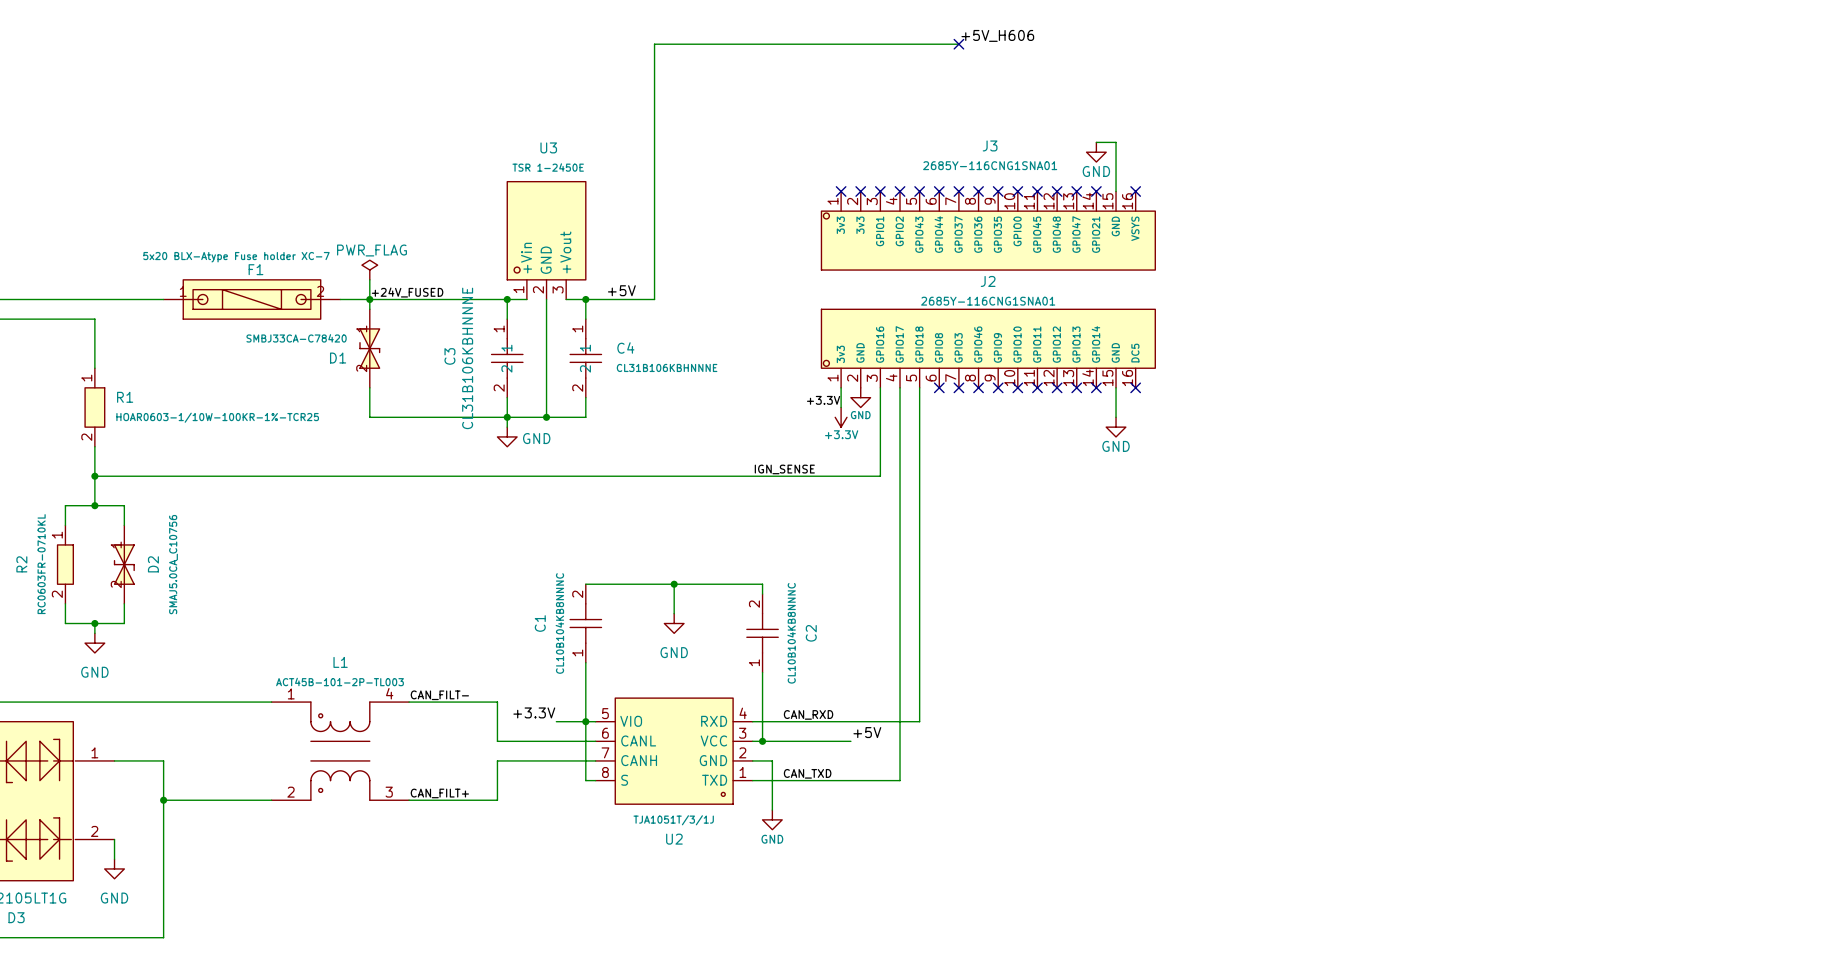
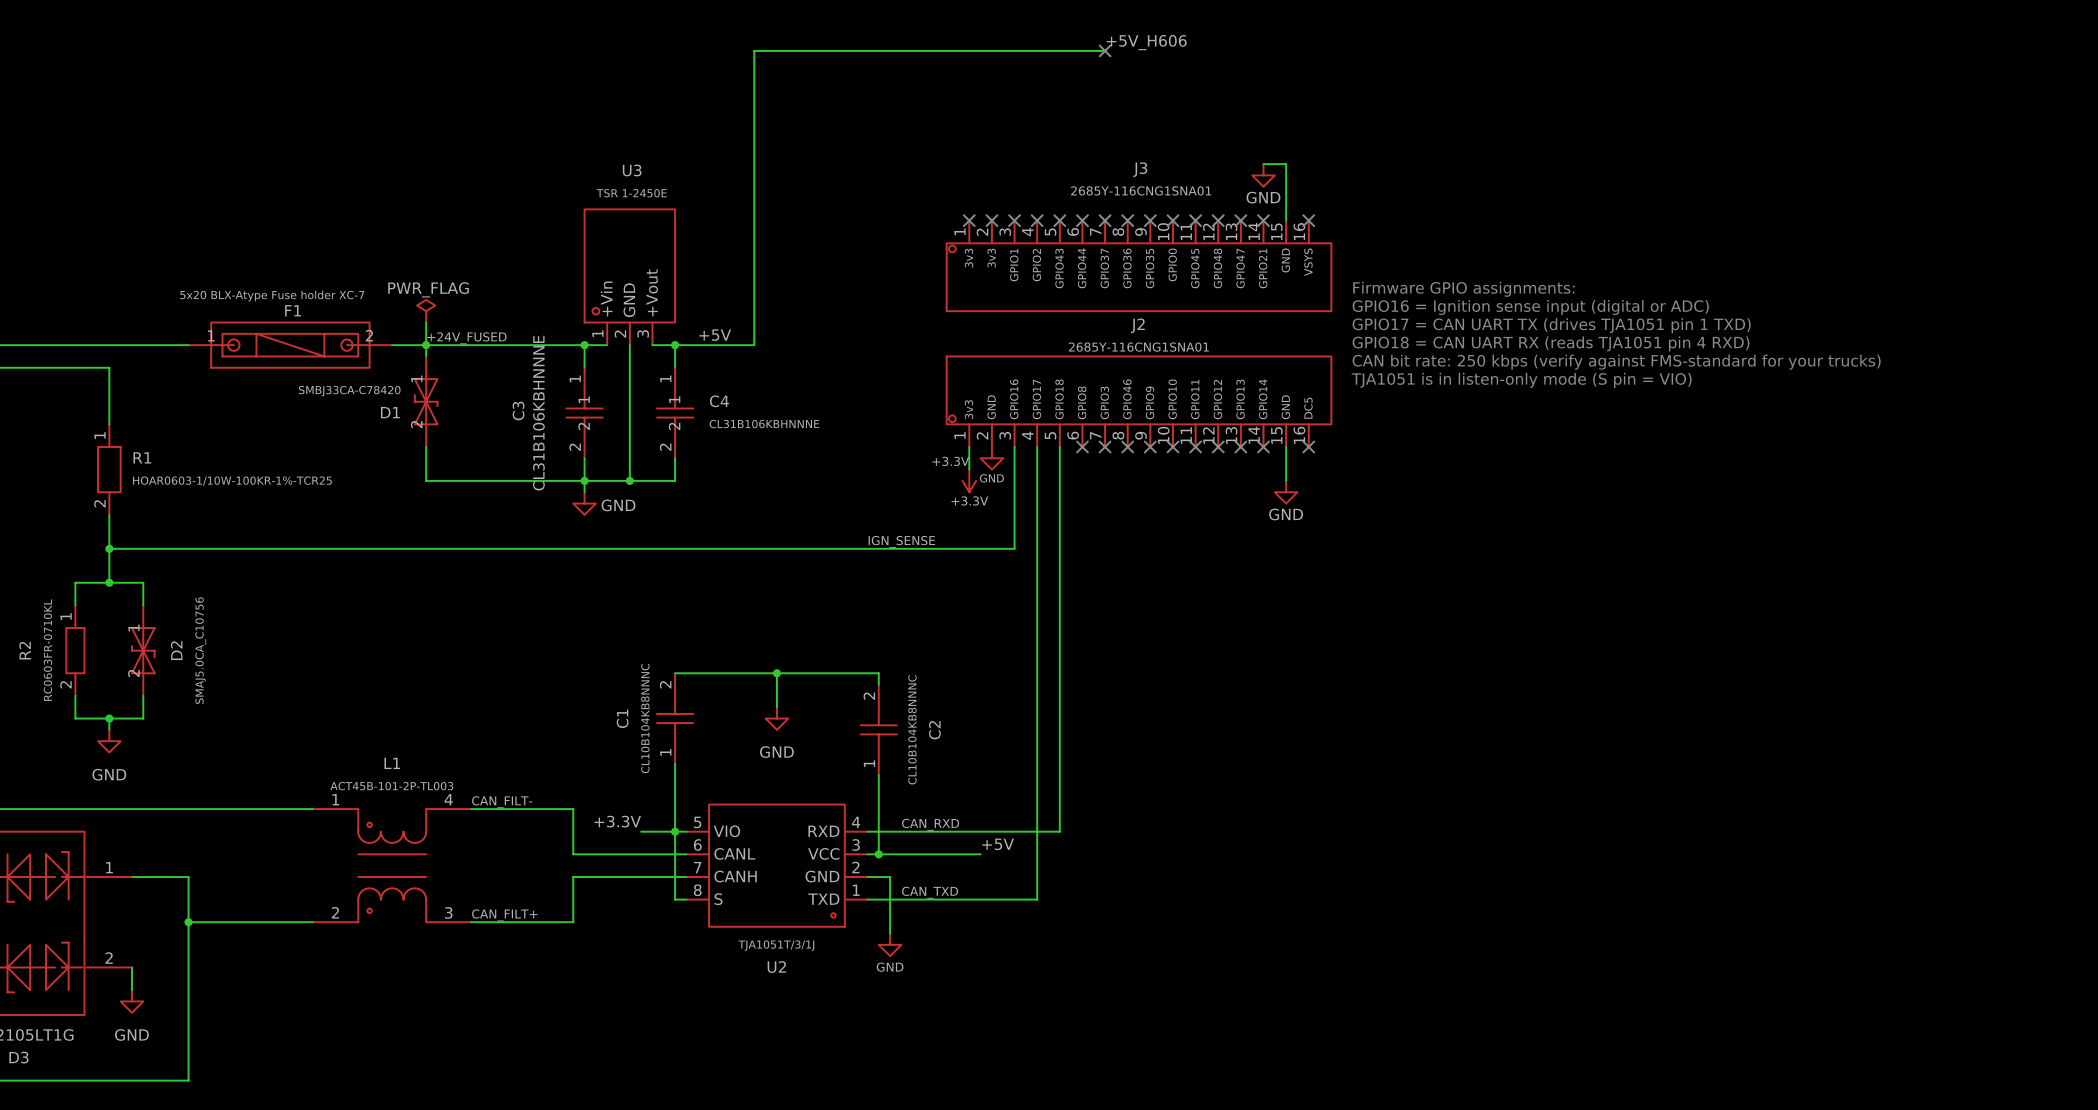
text: none -> Firmware GPIO assignments: (1463, 289)
text: none -> GPIO16 = Ignition sense input (digital or ADC) (1530, 307)
text: none -> GPIO17 = CAN UART TX (drives TJA1051 pin 1 TXD) (1551, 325)
text: none -> GPIO18 = CAN UART RX (reads TJA1051 pin 4 RXD) (1550, 343)
text: none -> CAN bit rate: 250 kbps (verify against FMS-standard for your trucks) (1616, 362)
text: none -> TJA1051 is in listen-only mode (S pin = VIO) (1521, 380)

